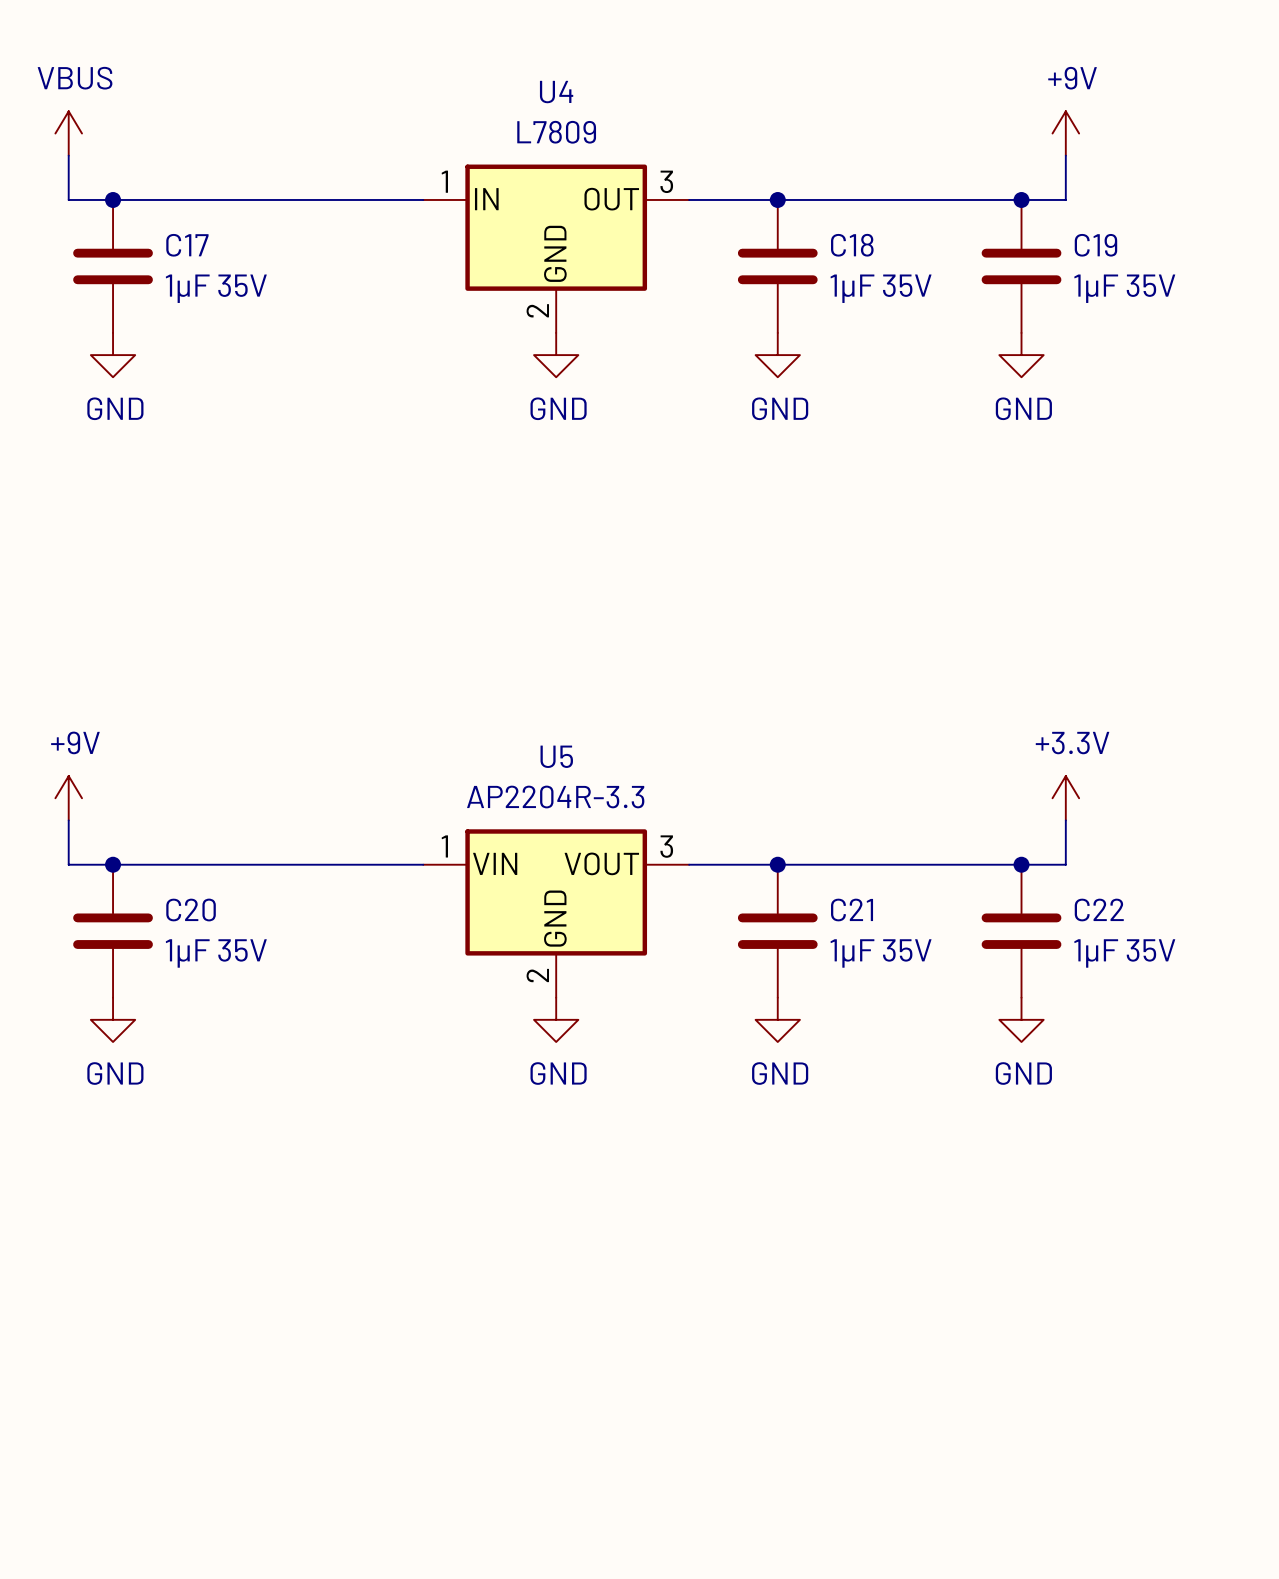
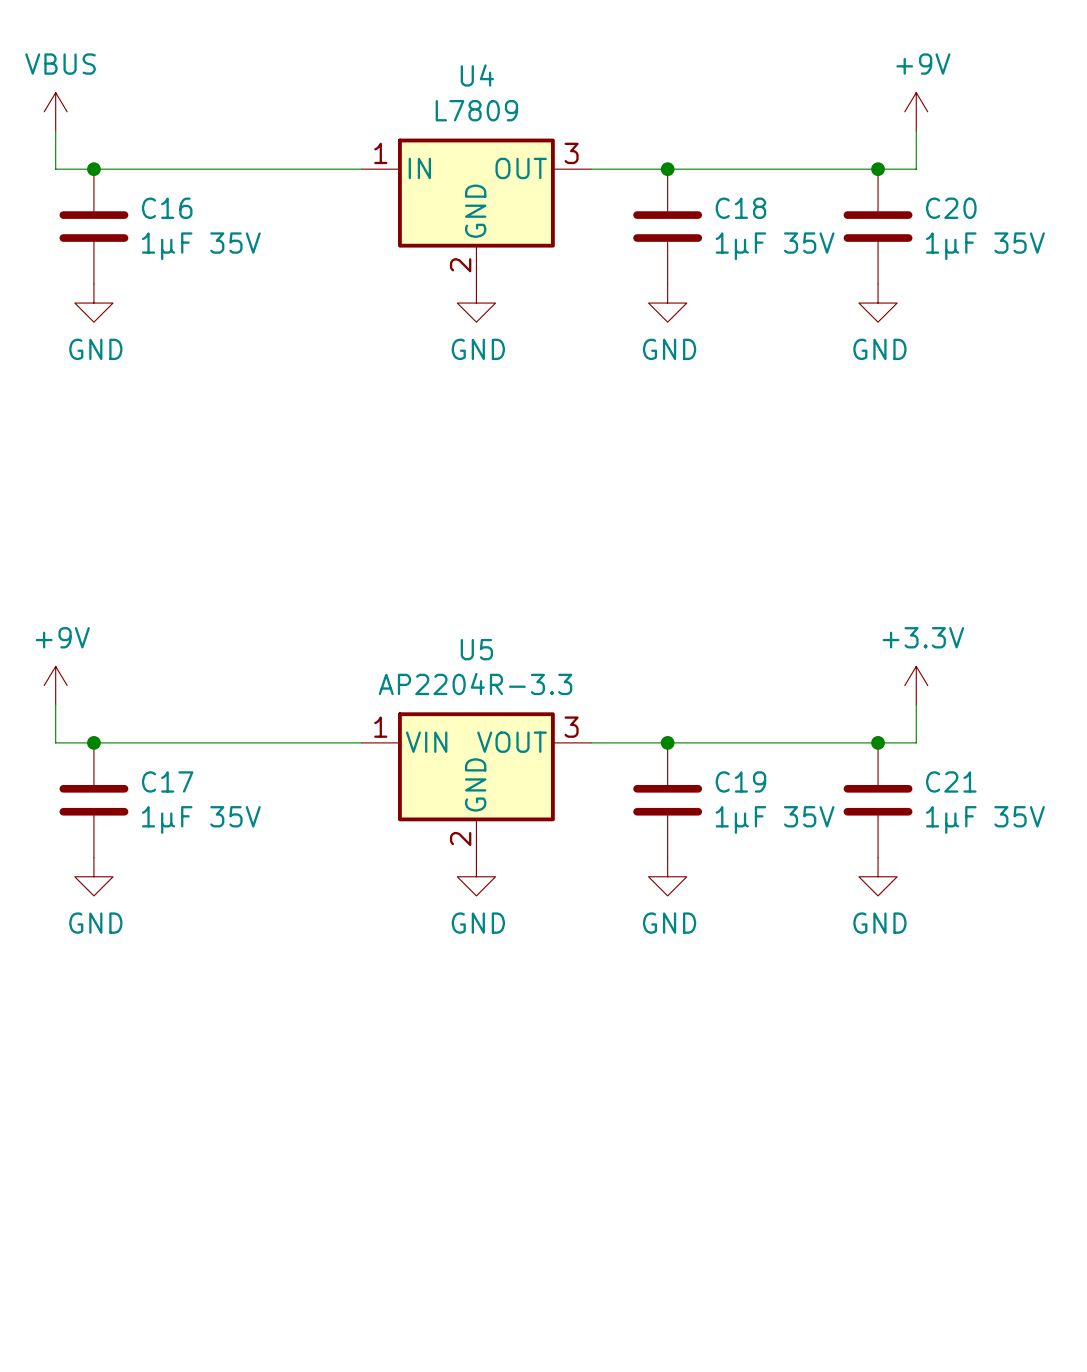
C17 name: C17 (187, 245) -> C16 (167, 208)
C19 name: C19 (1095, 245) -> C20 (951, 208)
C20 name: C20 (191, 910) -> C17 (167, 781)
C21 name: C21 (852, 910) -> C19 (740, 781)
C22 name: C22 (1099, 910) -> C21 (951, 781)

